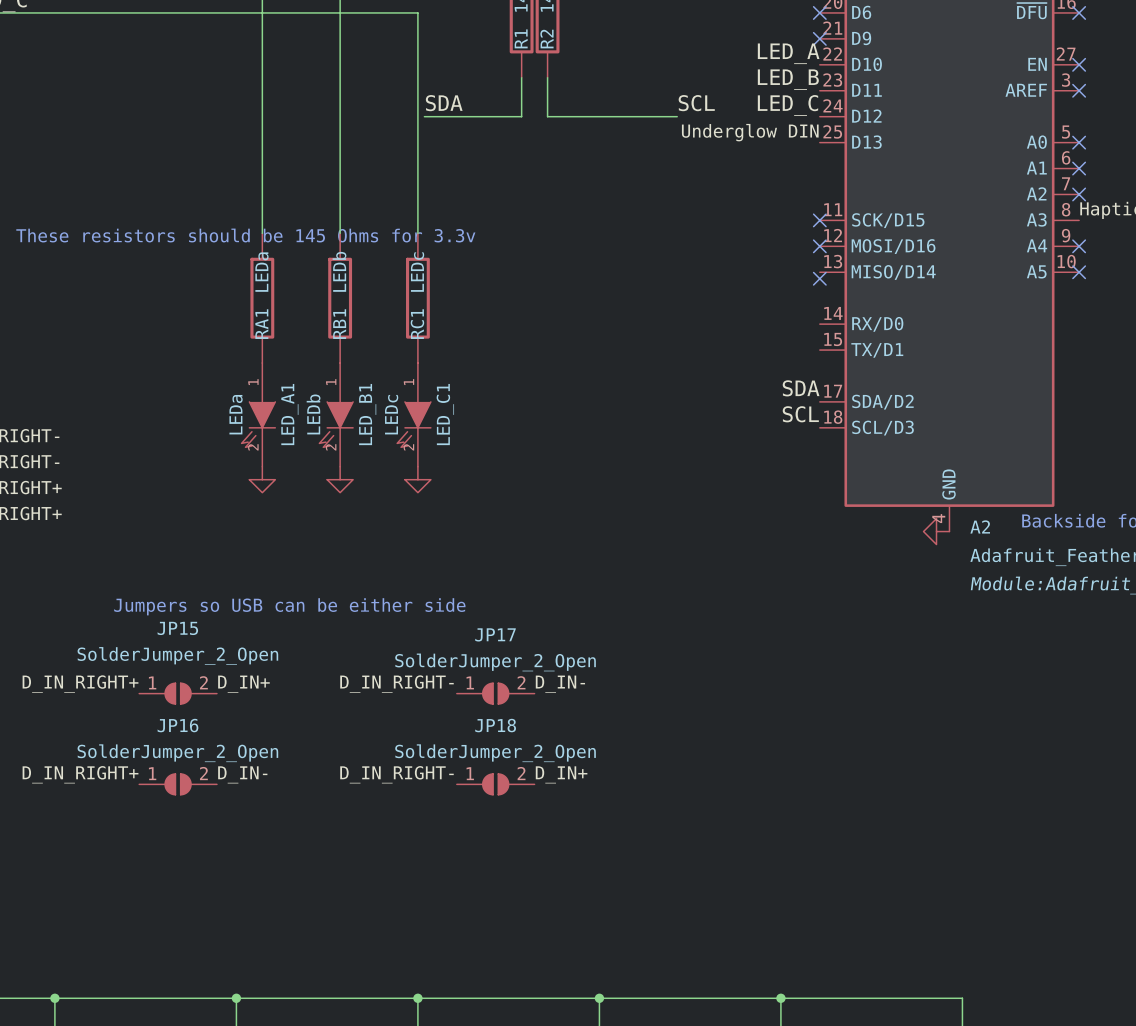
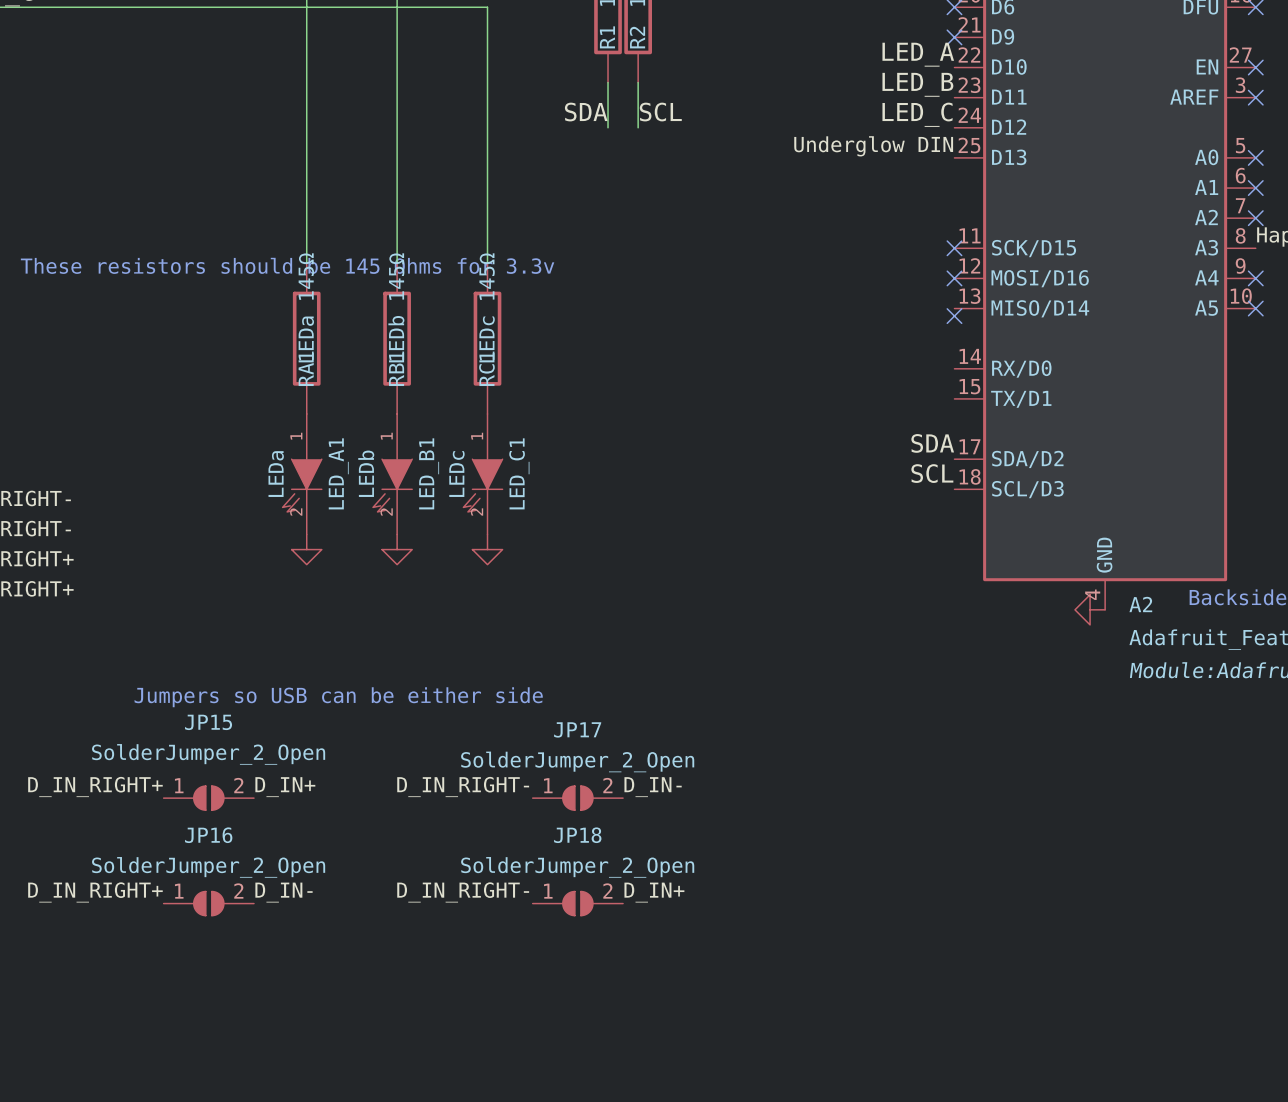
label position: SDA (444, 103) -> SDA (586, 112)
label position: SCL (696, 103) -> SCL (660, 112)
wire: (424, 116) (521, 116) -> none
wire: (547, 116) (677, 116) -> none
RB1 value: LEDb (339, 271) -> LEDb 145Ω (396, 307)
RA1 value: LEDa (261, 272) -> LEDa 145Ω (306, 307)
RC1 value: LEDc (417, 272) -> LEDc 145Ω (487, 307)

